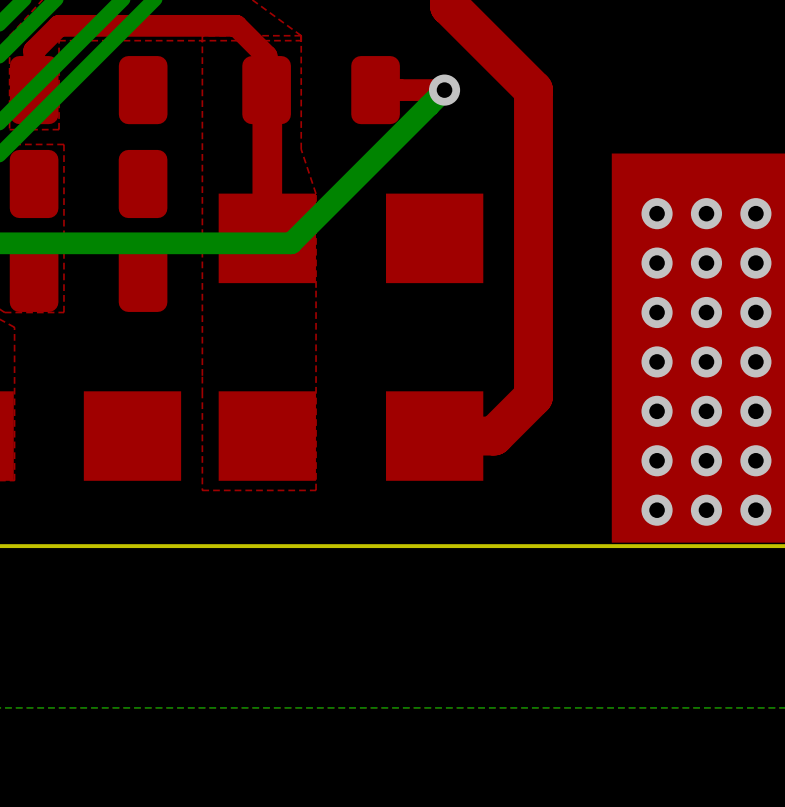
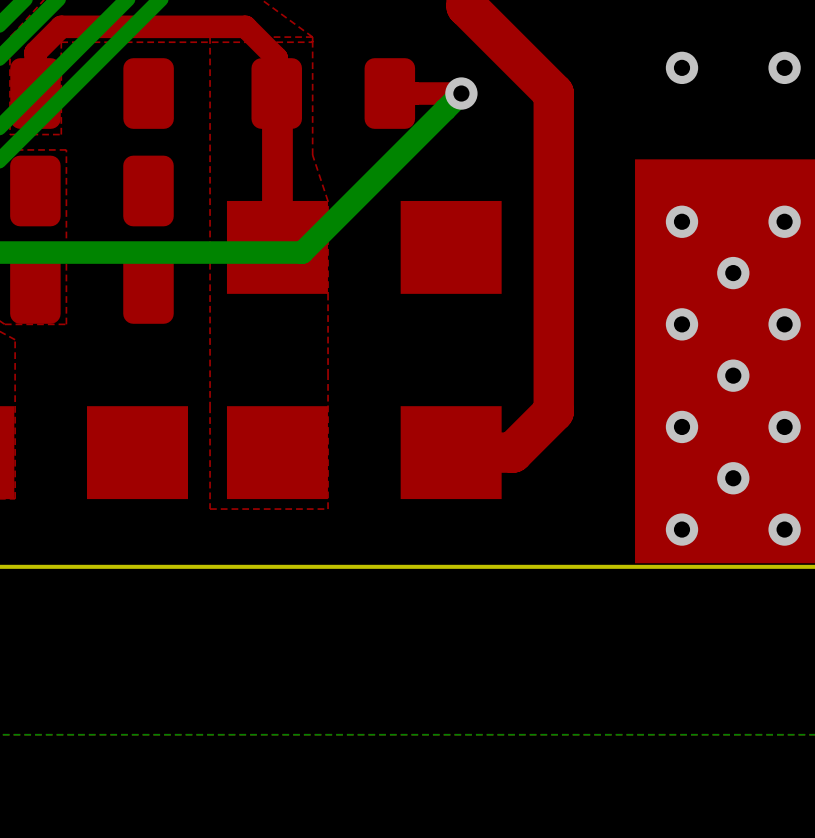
via: none -> (682, 67)
via: none -> (784, 67)
via: (706, 213) -> none
via: (657, 263) -> none
via: (755, 263) -> none
via: (706, 312) -> none
via: (657, 361) -> none
via: (755, 361) -> none
via: (706, 411) -> none
via: (657, 460) -> none
via: (755, 460) -> none
via: (706, 510) -> none

